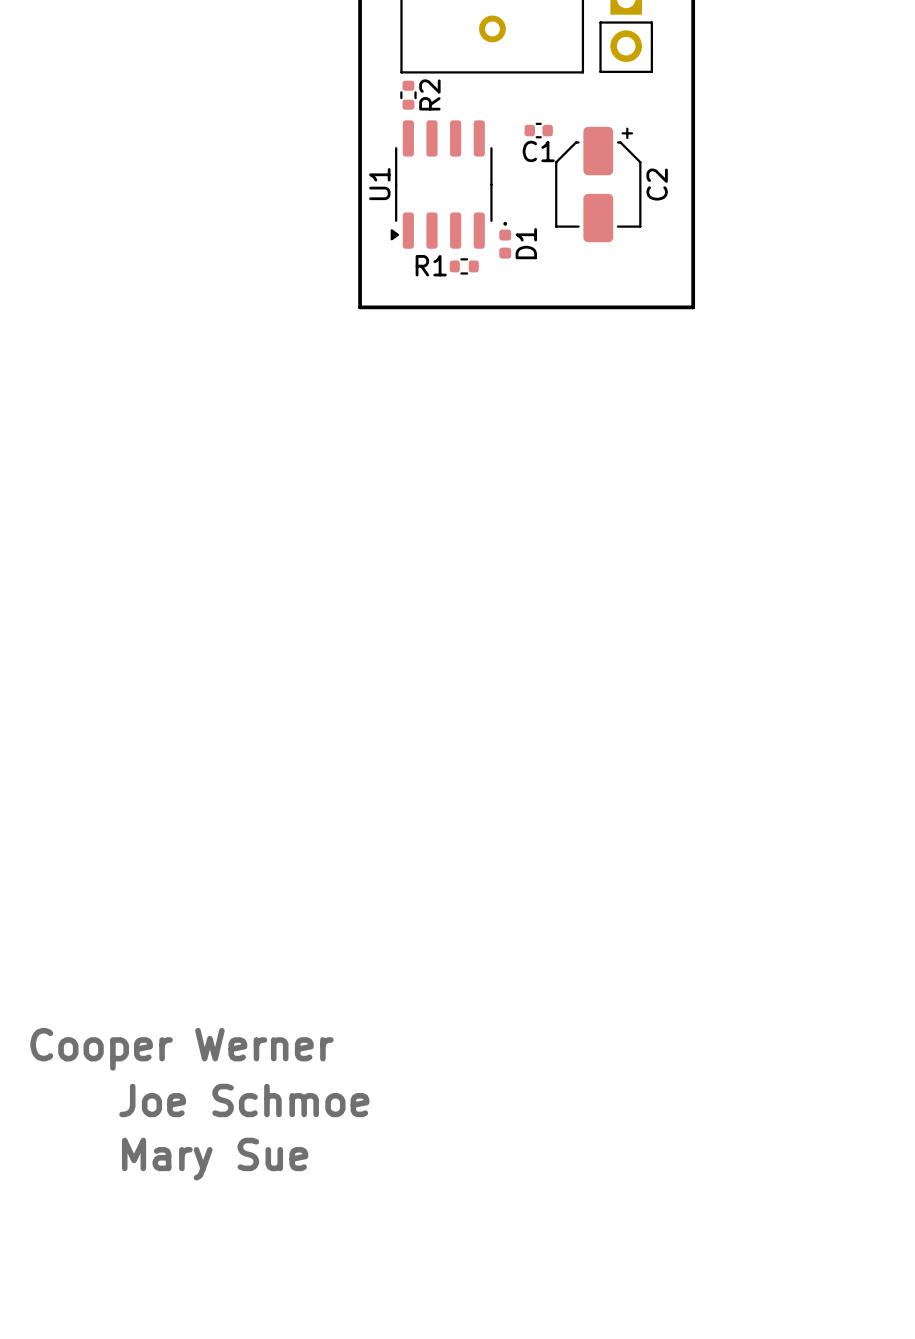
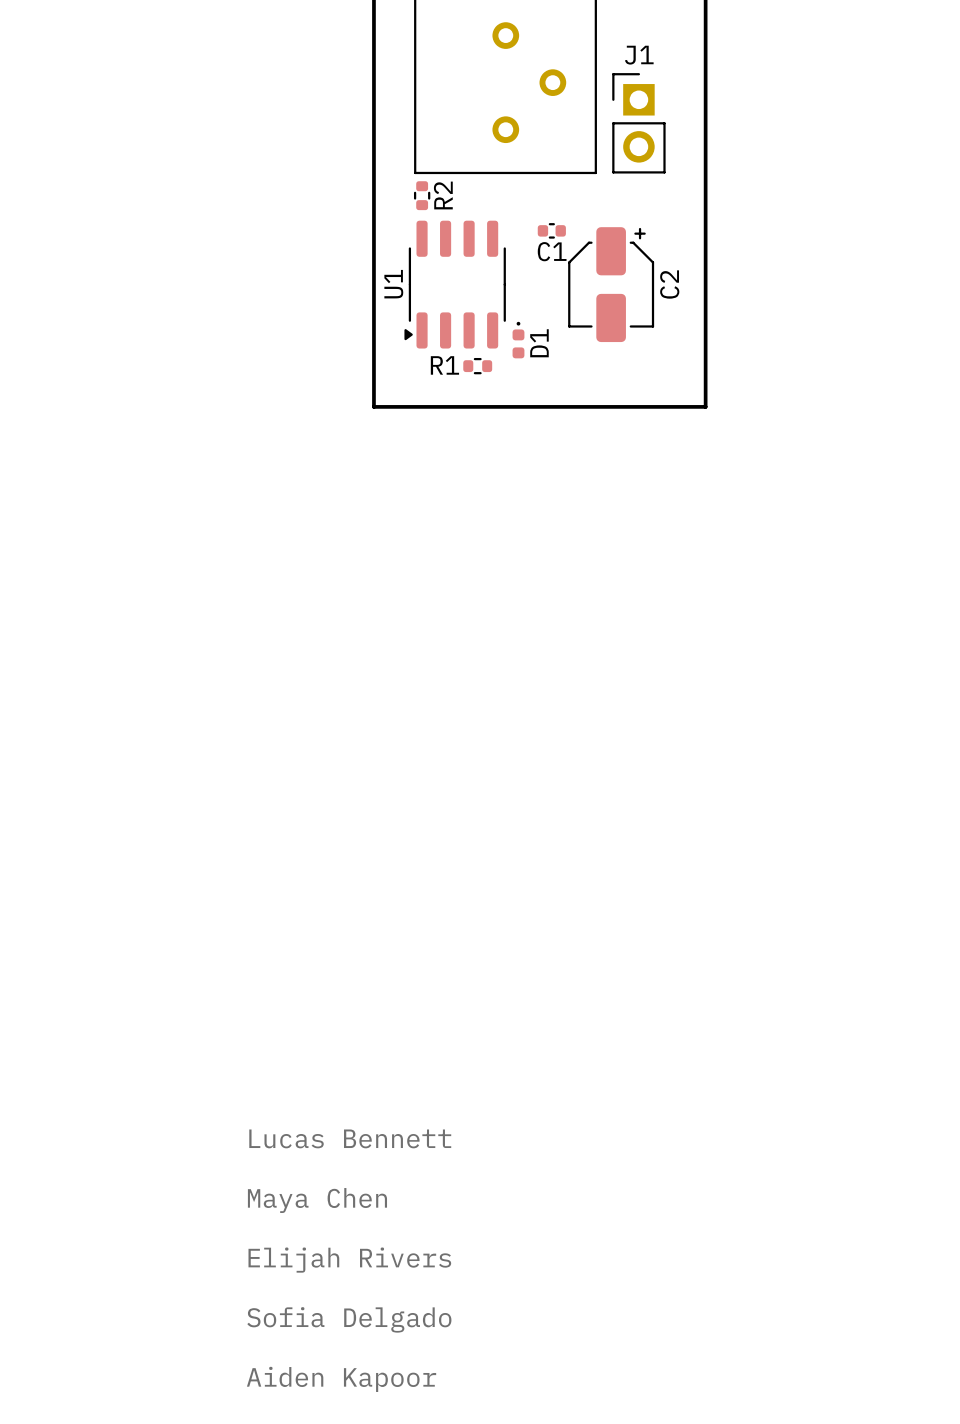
text: none -> Lucas Bennett (350, 1138)
text: Cooper Werner (182, 1049) -> none
text: Joe Schmoe (244, 1100) -> none
text: none -> Maya Chen (317, 1200)
text: Mary Sue (215, 1159) -> none
text: none -> Elijah Rivers (349, 1260)
text: none -> Sofia Delgado (349, 1319)
text: none -> Aiden Kapoor (341, 1379)

